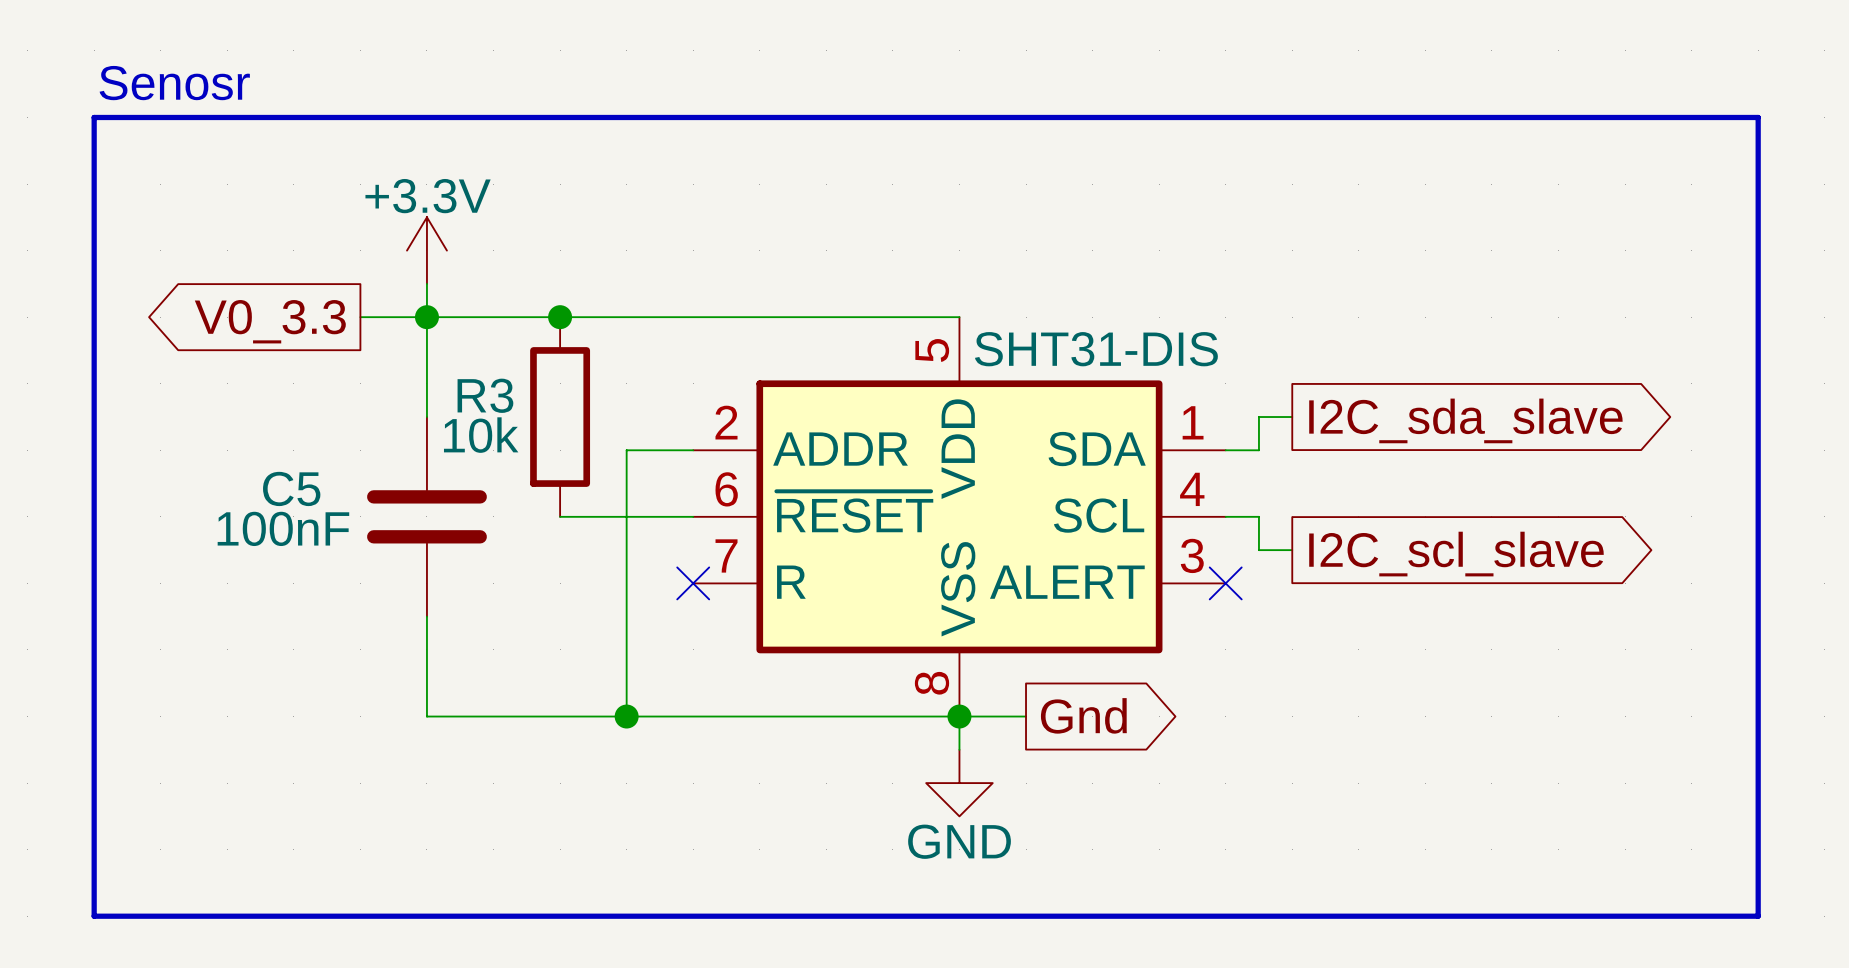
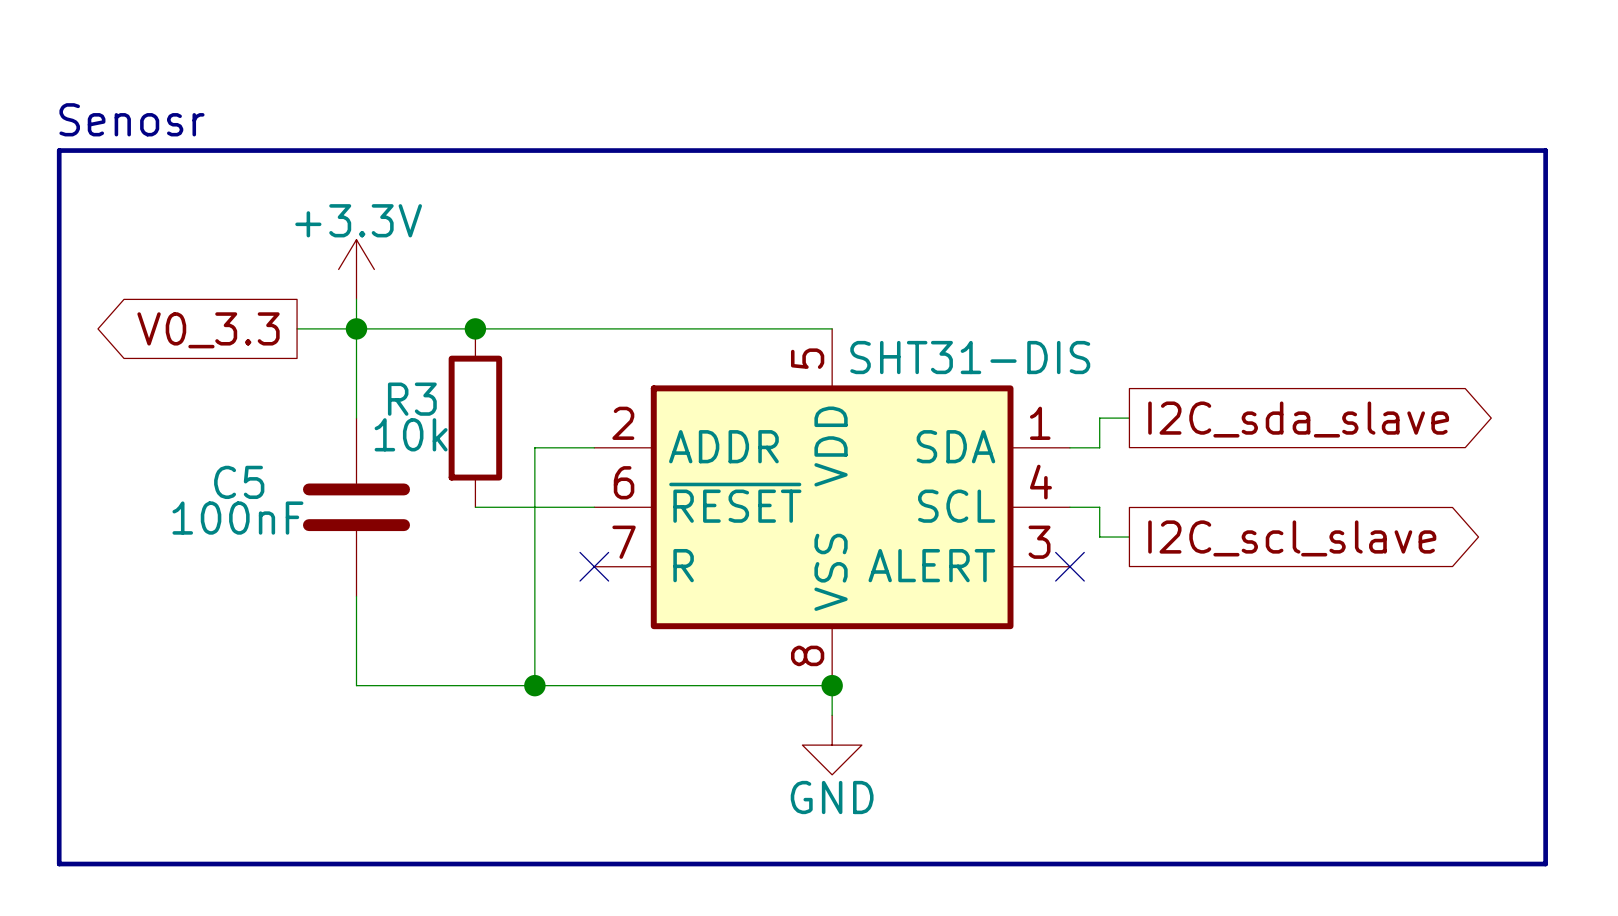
global label: Gnd (1083, 715) -> none
wire: (959, 716) (1026, 716) -> none

